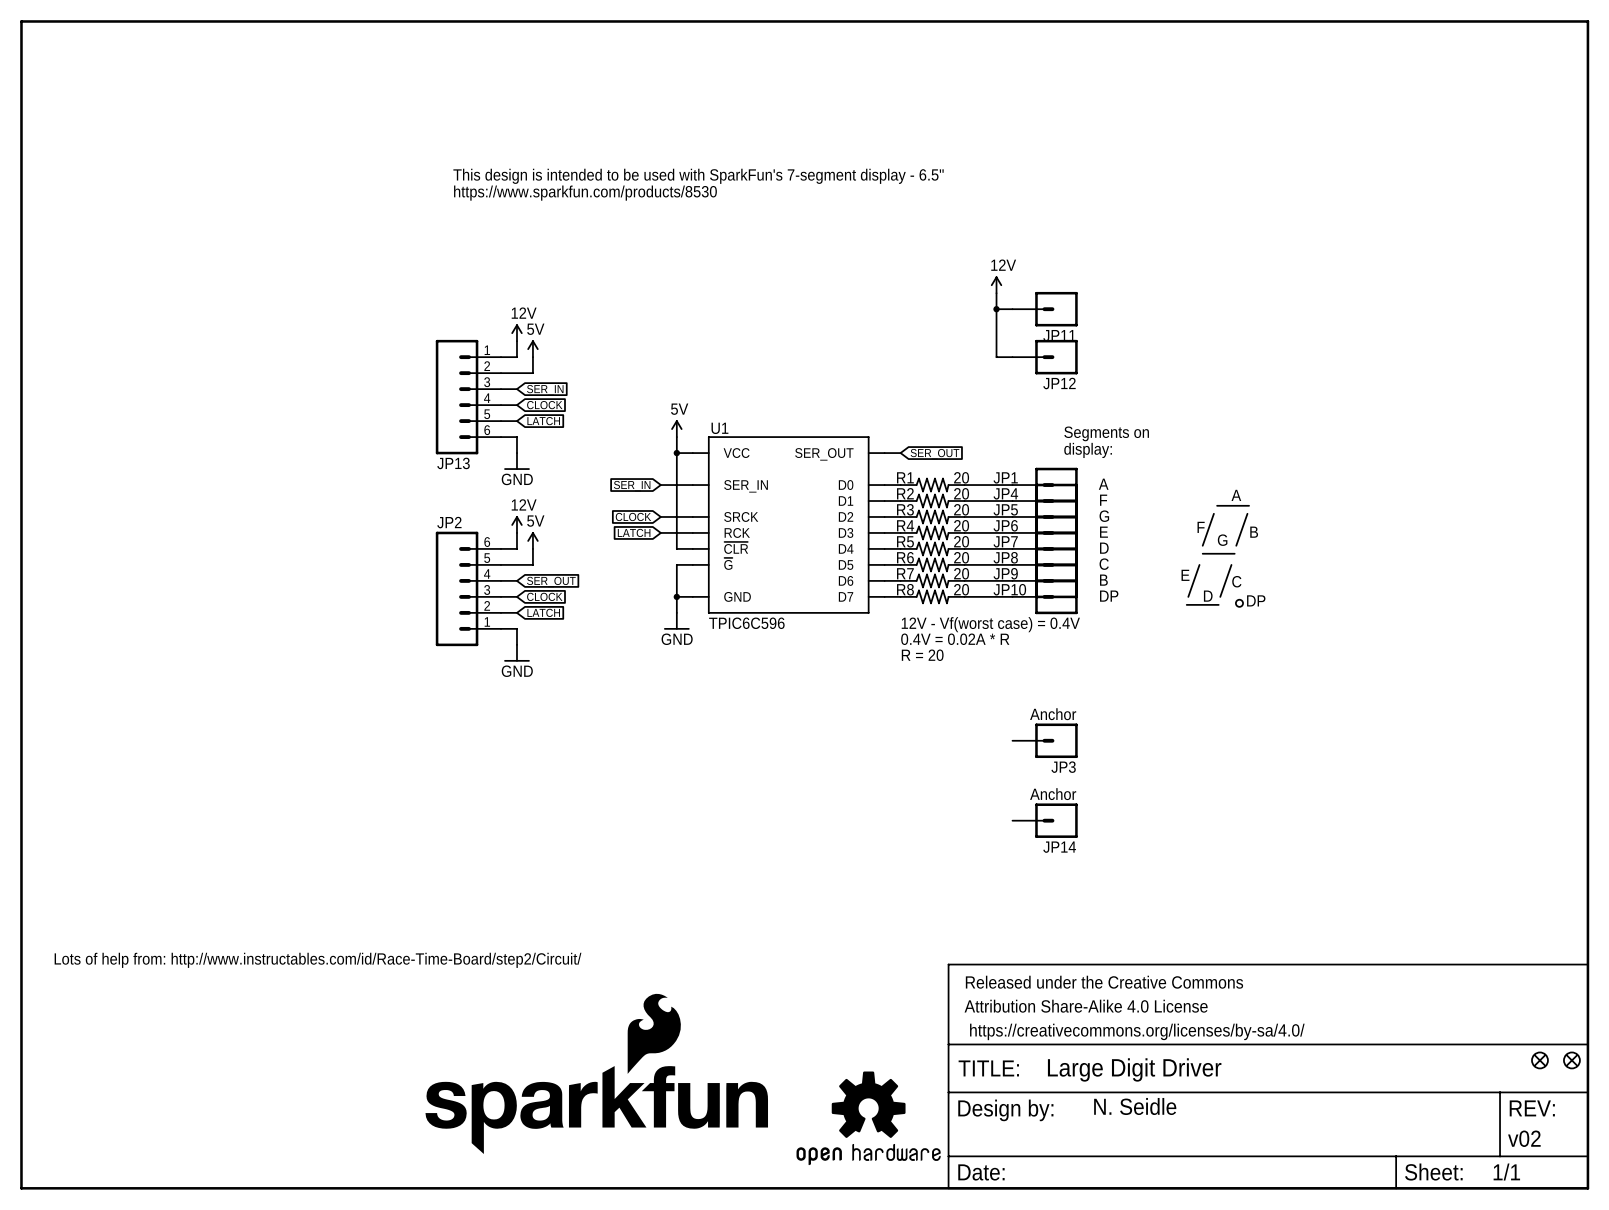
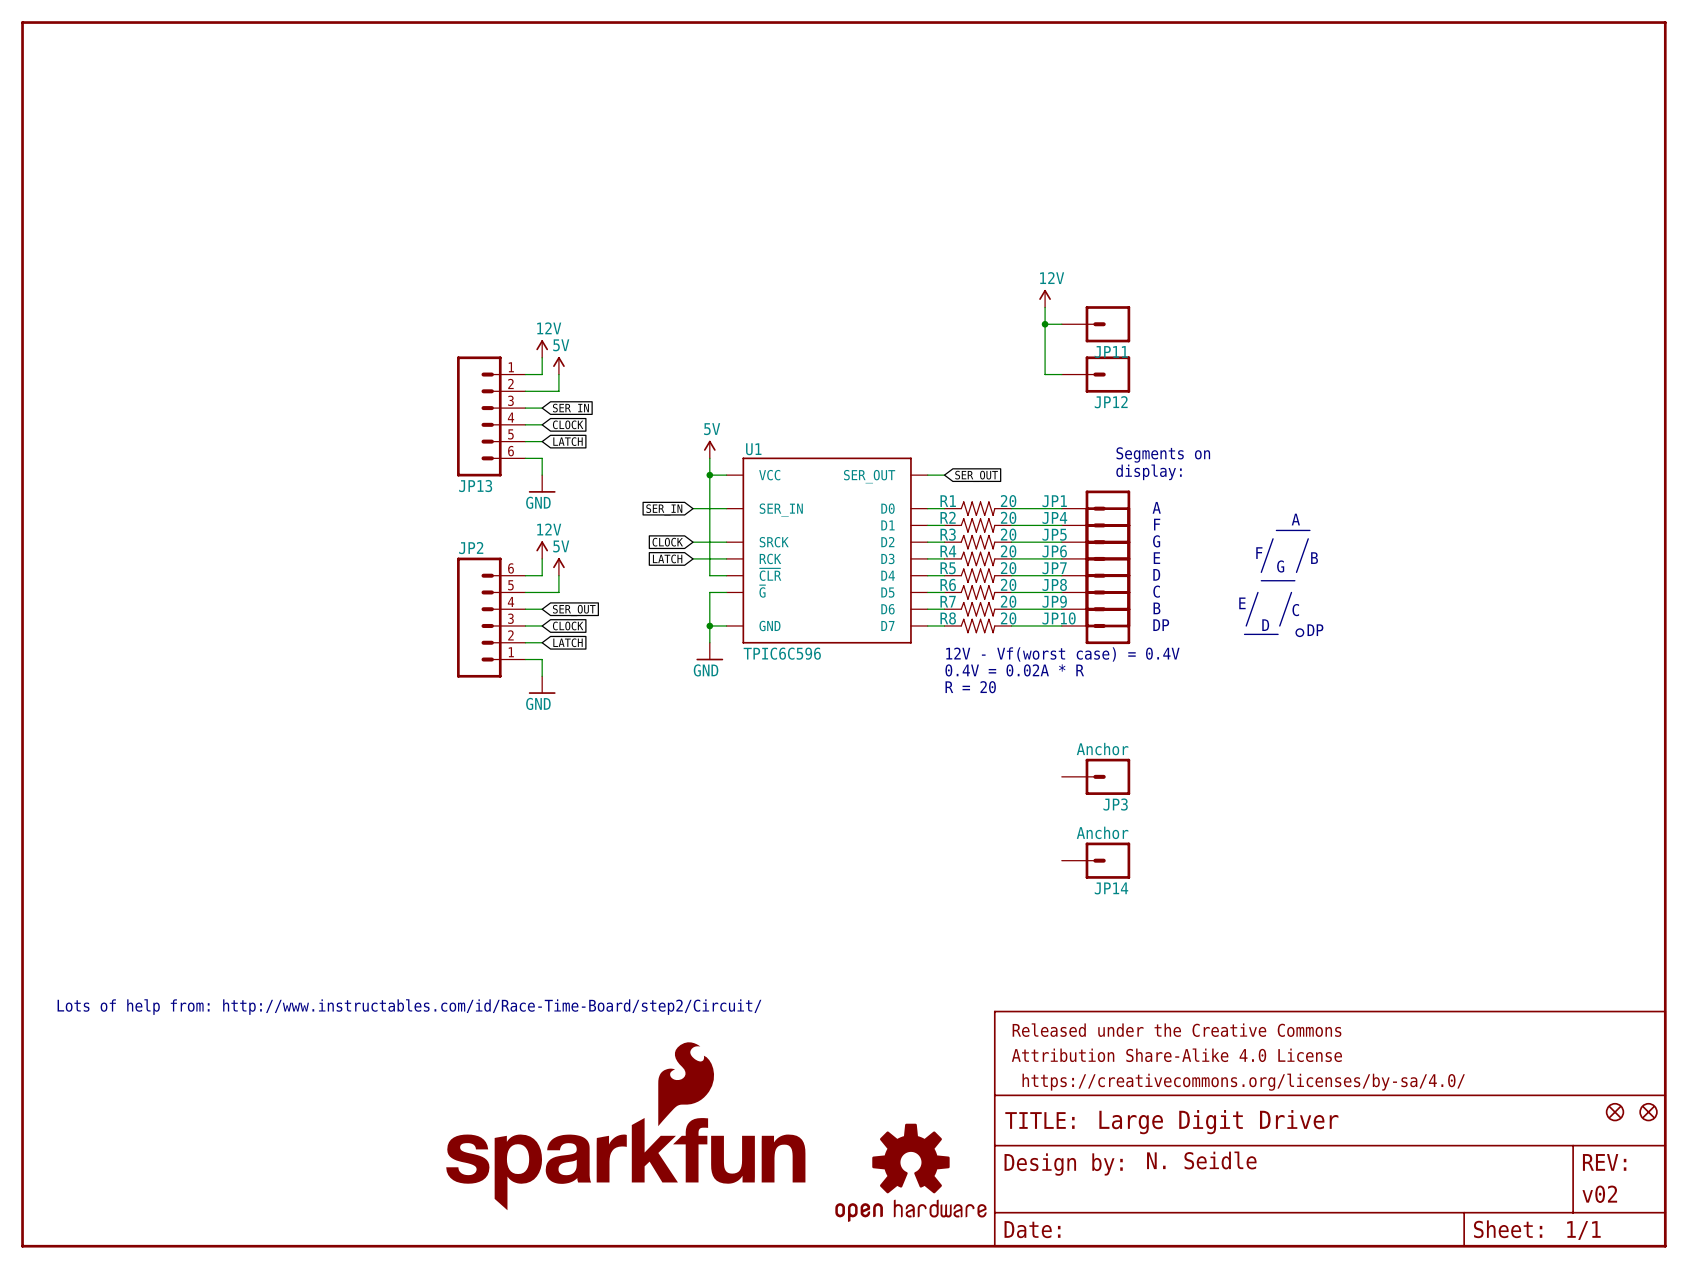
text: This design is intended to be used with SparkFun's 7-segment display - 6.5" (698, 176) -> none
text: https://www.sparkfun.com/products/8530 (585, 193) -> none

